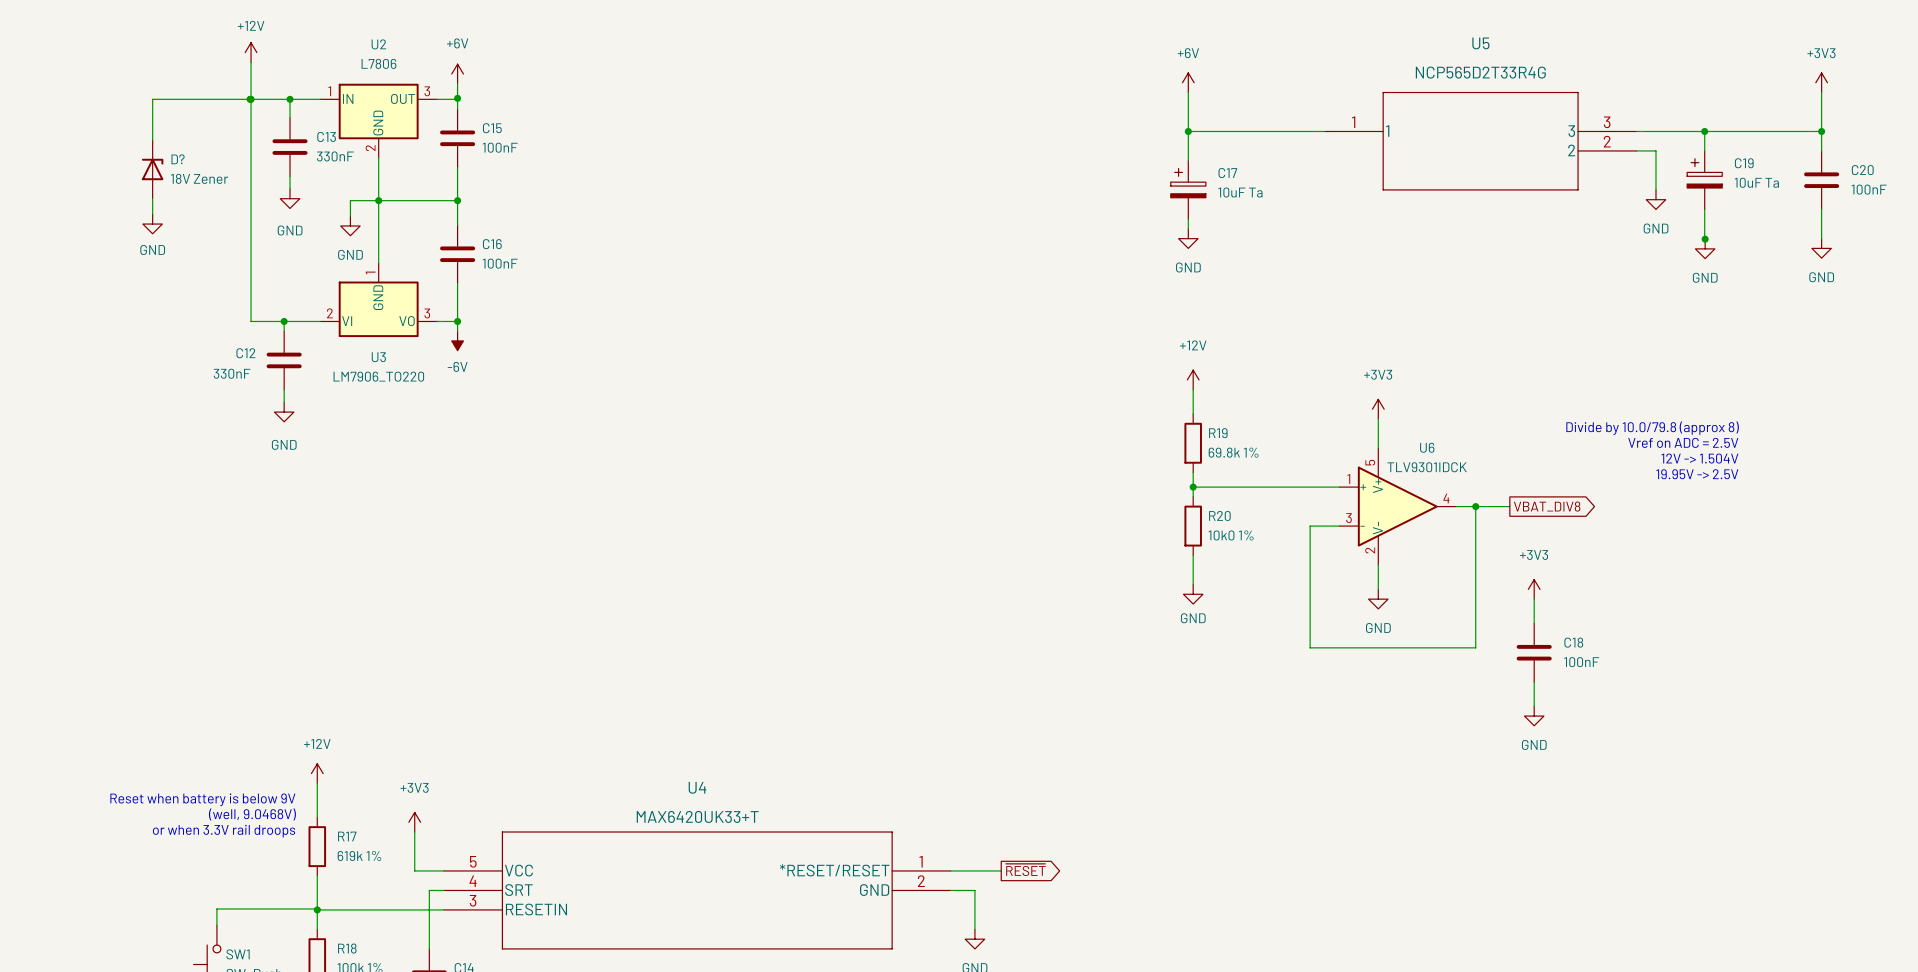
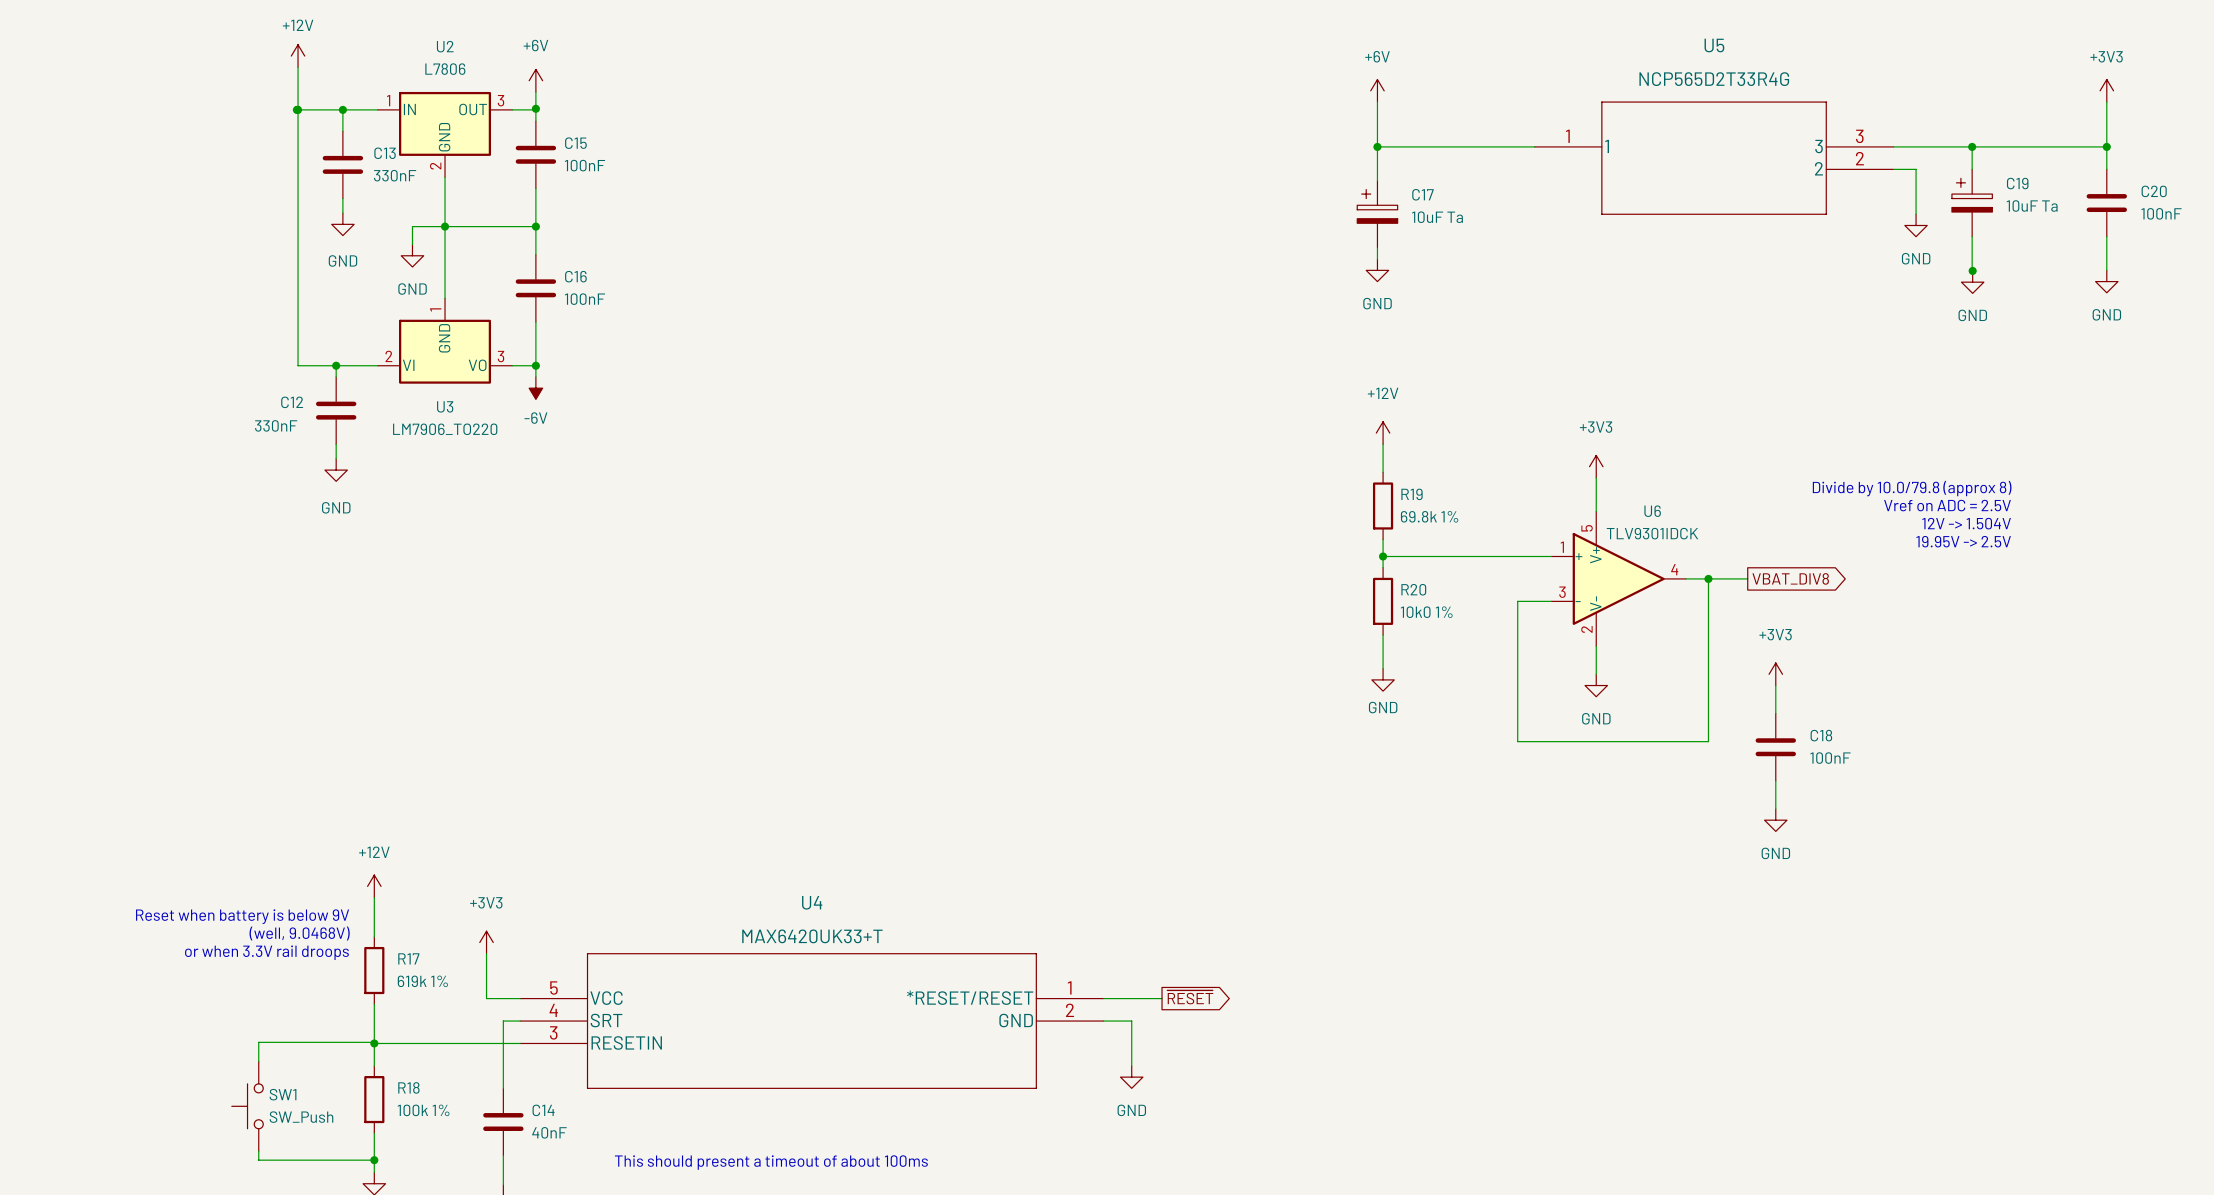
wire: (250, 99) (152, 99) (152, 140) -> none
D?: 18V Zener (152, 169) -> none
wire: (152, 198) (152, 214) -> none
power symbol: GND (152, 224) -> none

